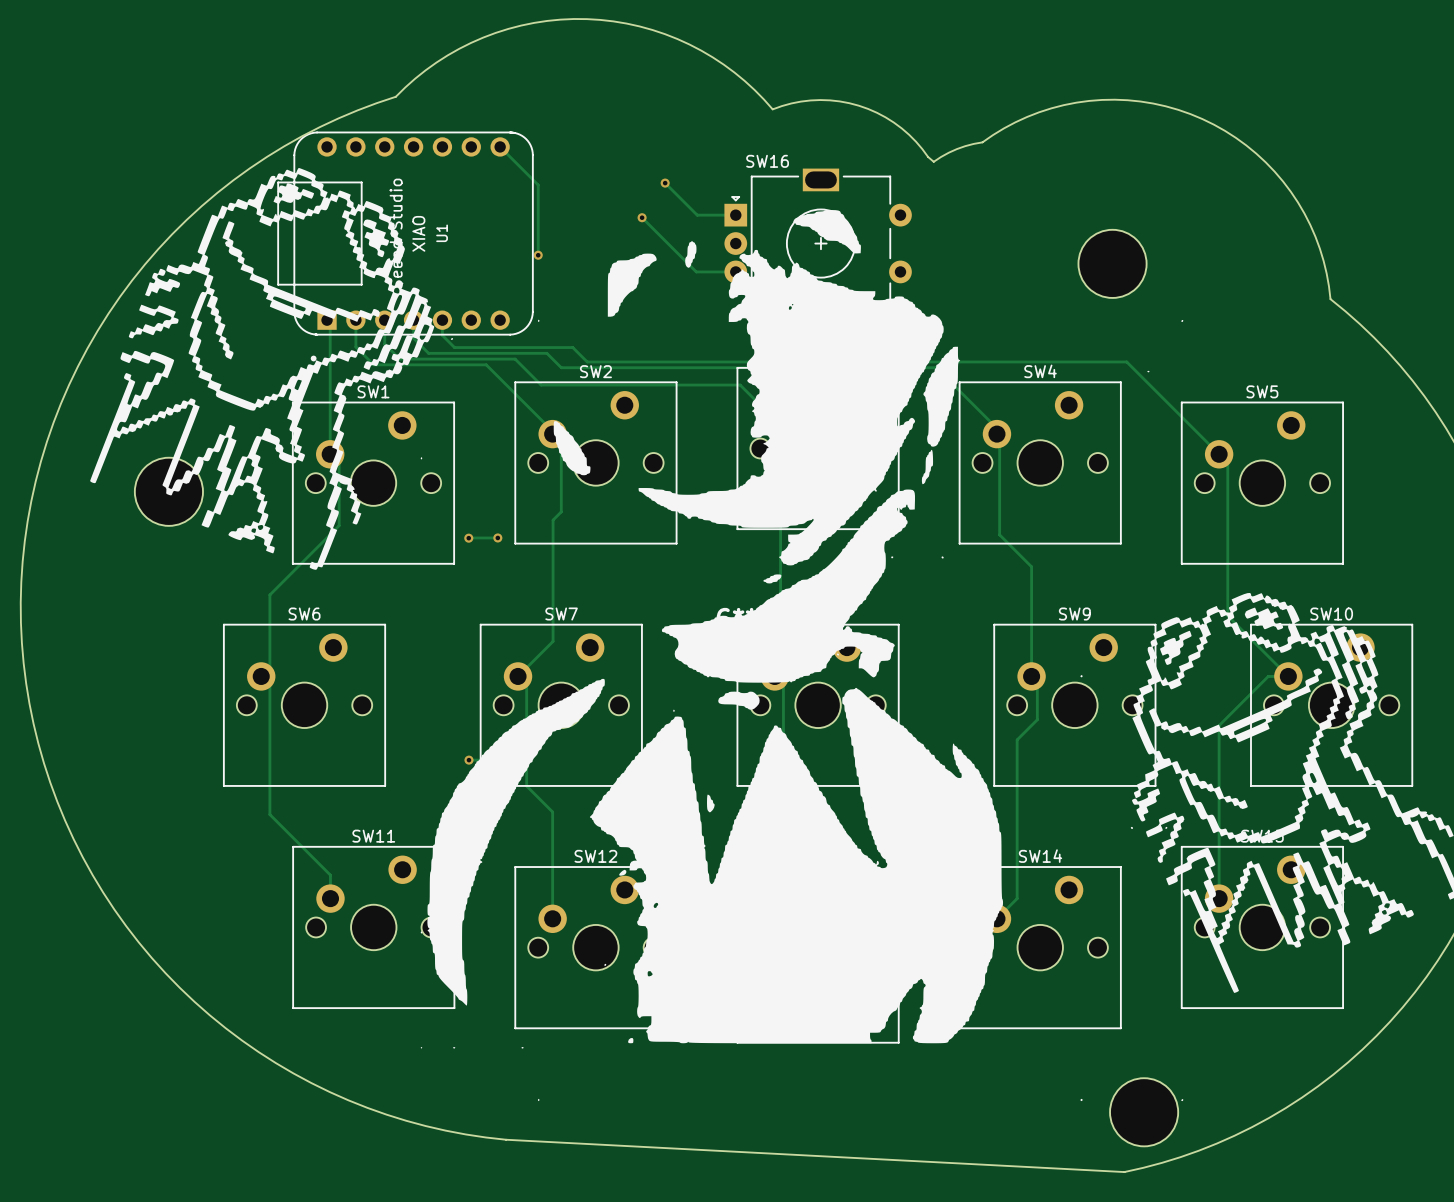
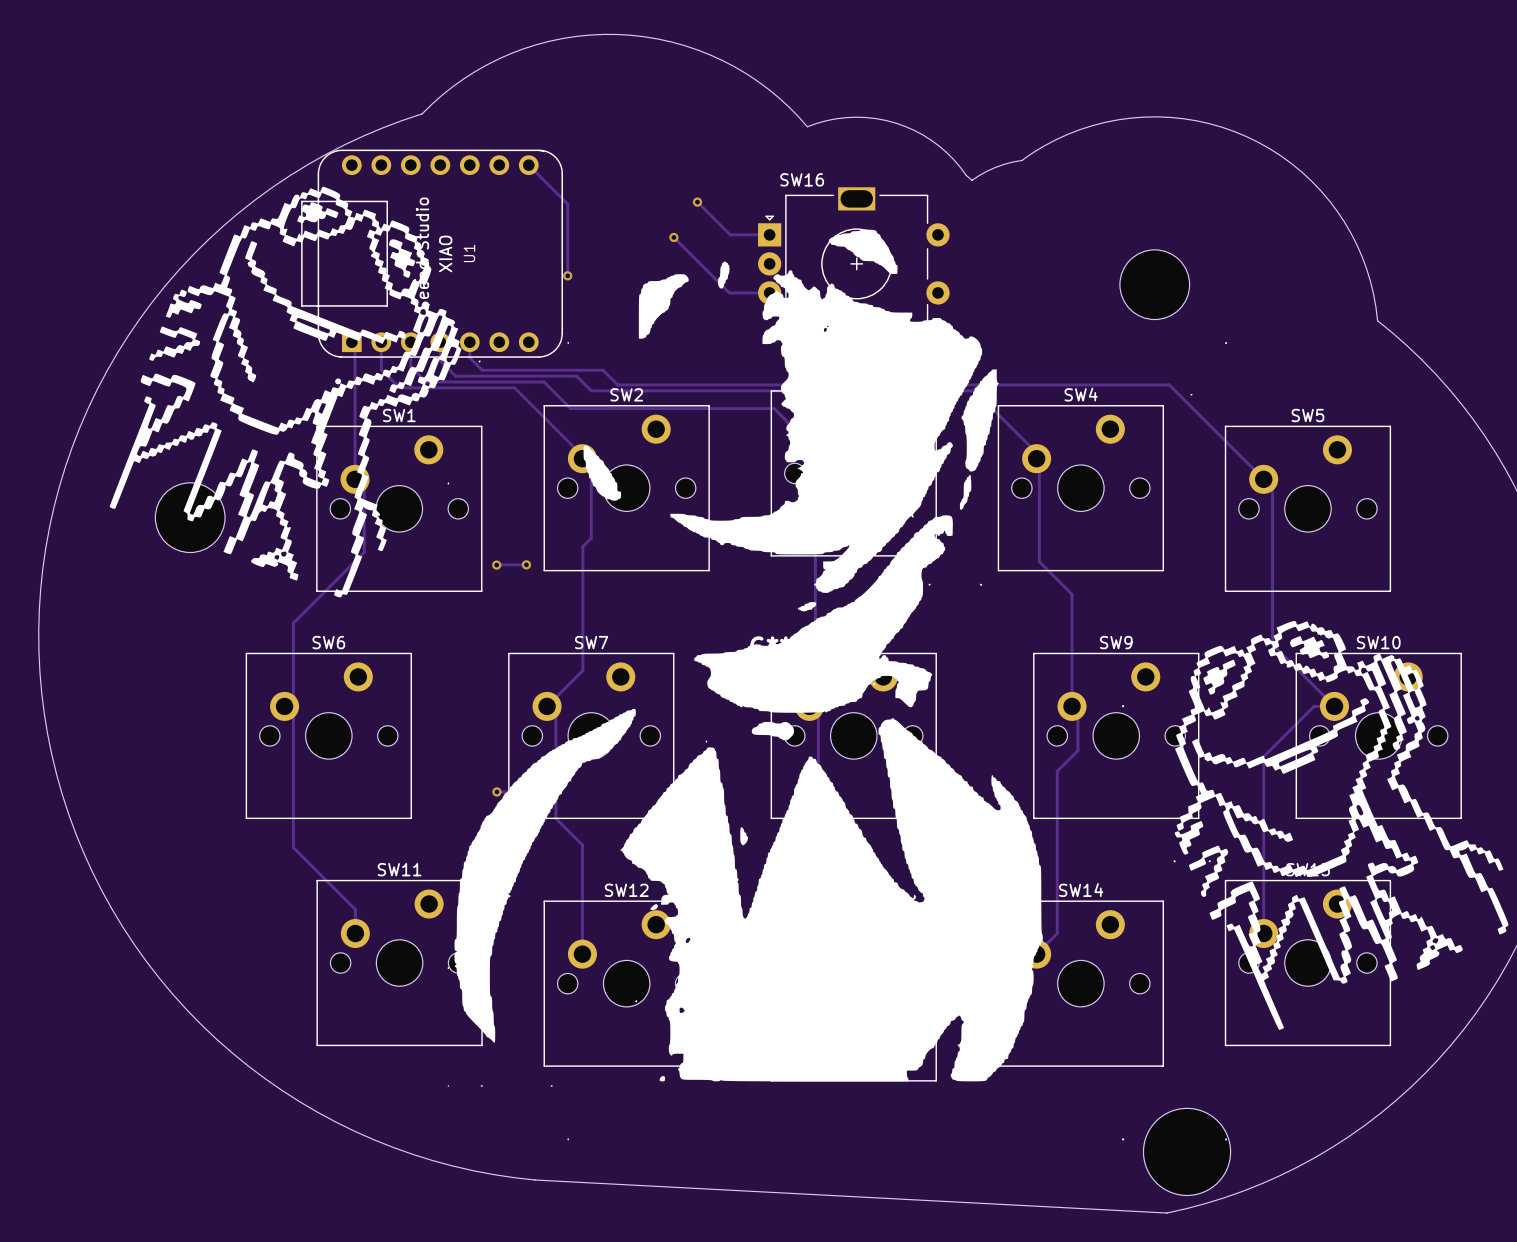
part footprint: [1110, 1078, 1179, 1147] -> [1143, 1108, 1231, 1196]

